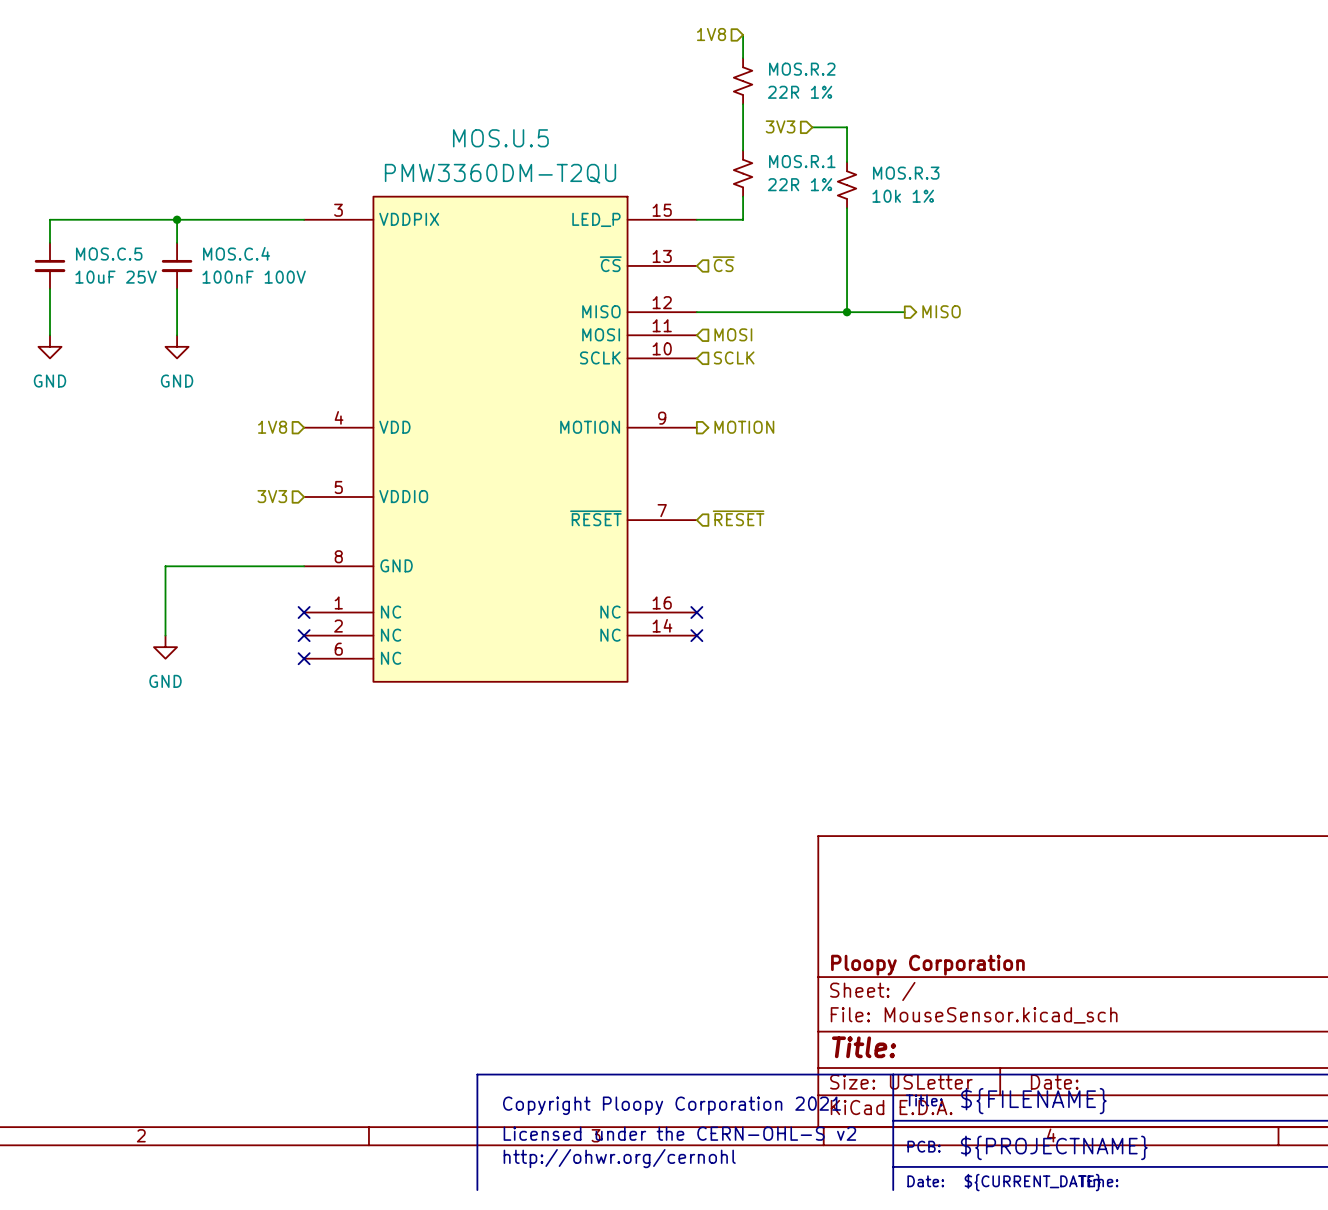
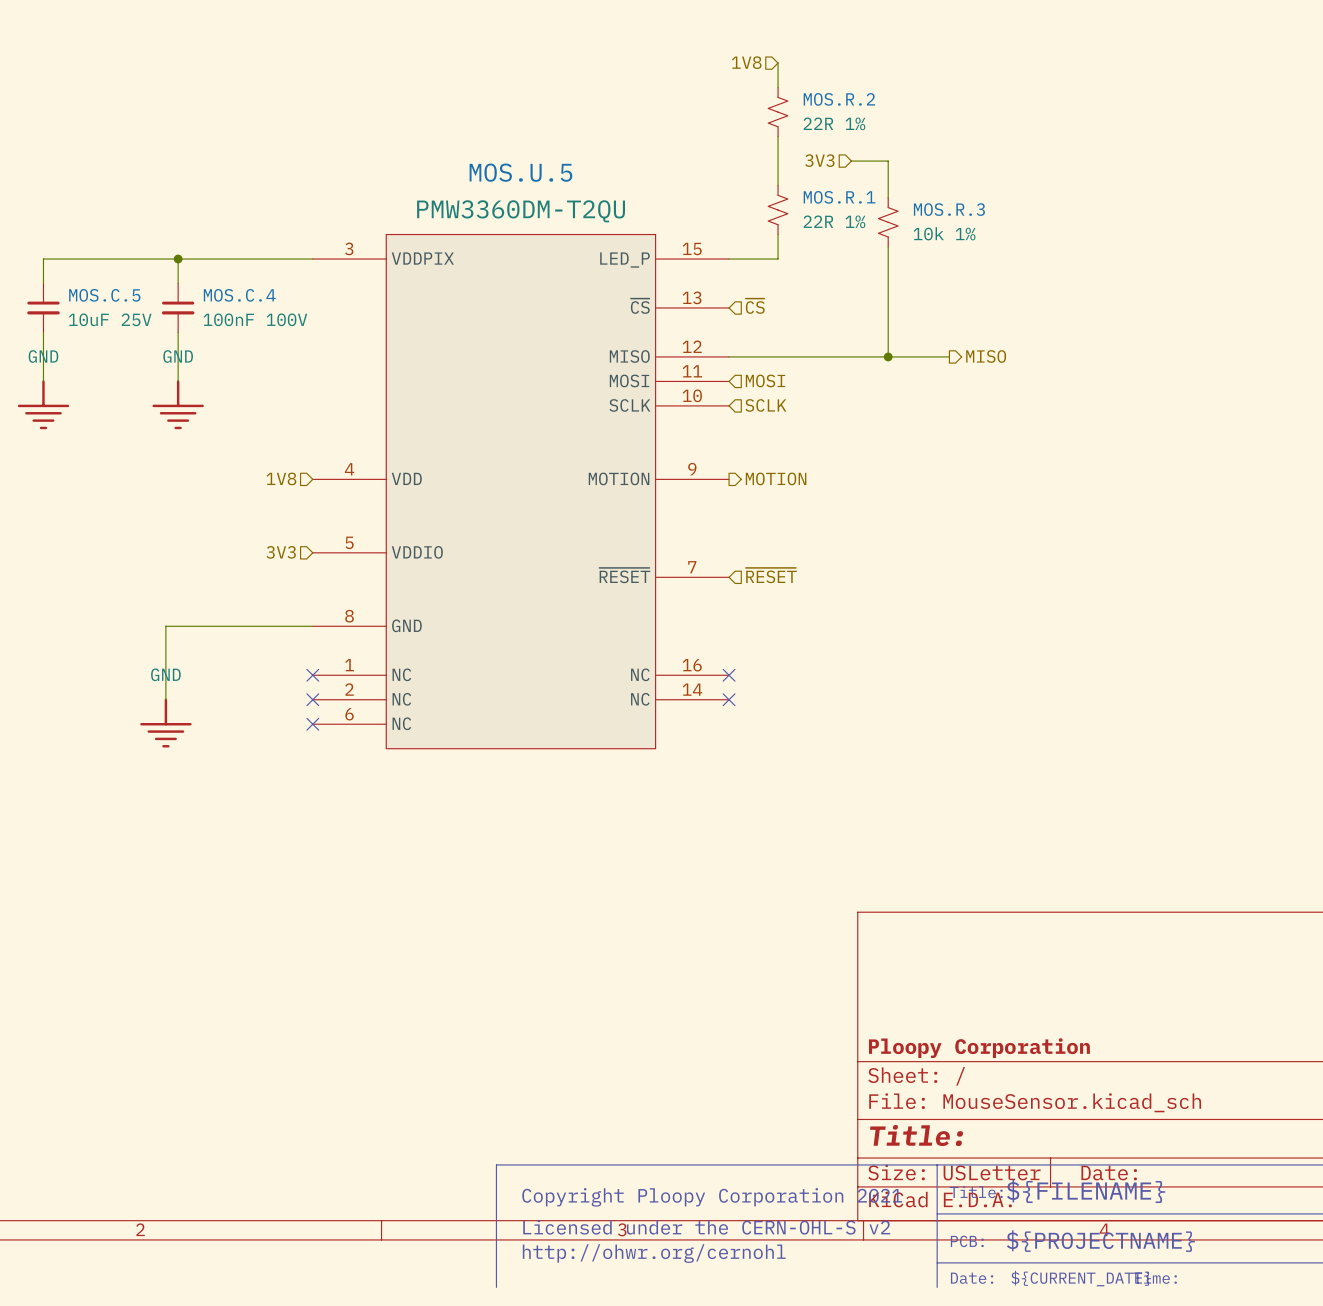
power symbol: GND (49, 346) -> none
power symbol: GND (177, 346) -> none
power symbol: none -> GND (43, 404)
power symbol: none -> GND (178, 404)
power symbol: GND (165, 647) -> none
power symbol: none -> GND (165, 723)

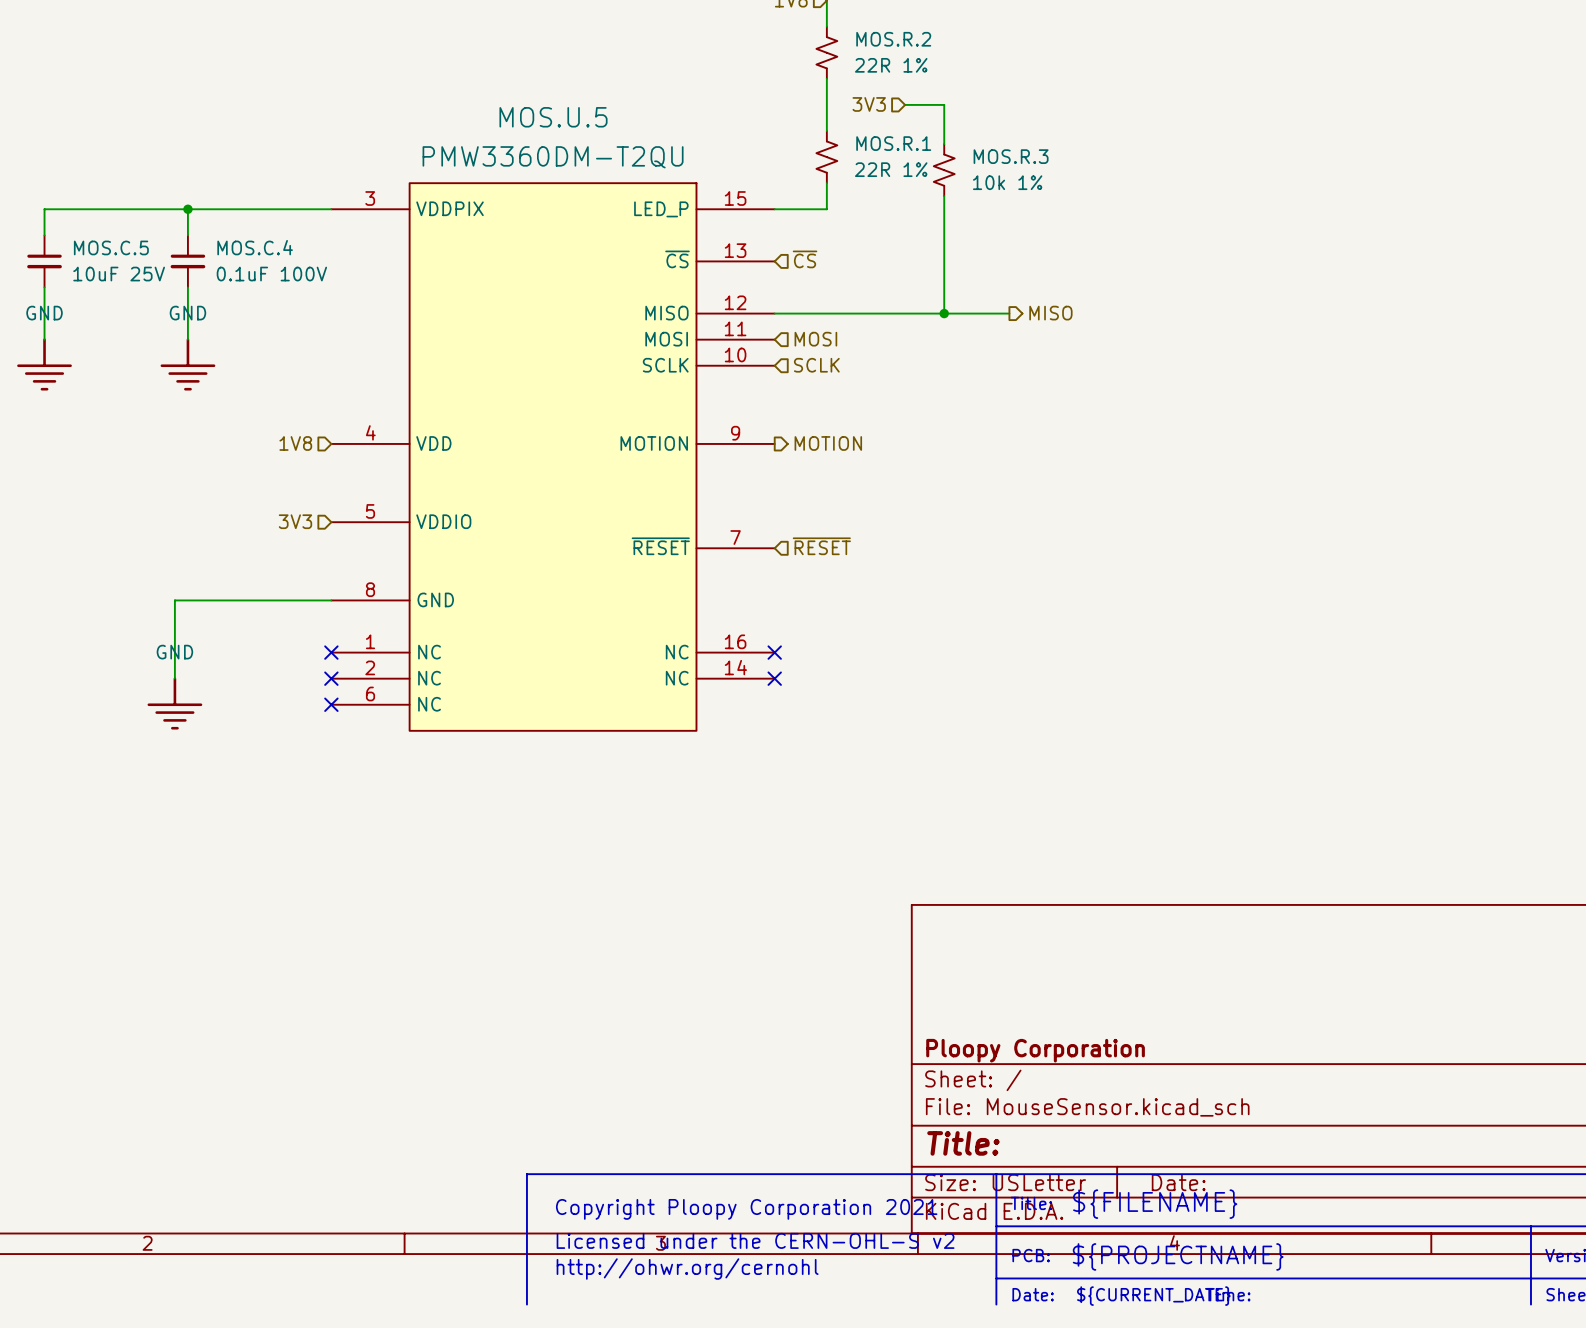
MOS.C.4 value: 100nF 100V (255, 319) -> 0.1uF 100V (271, 274)

